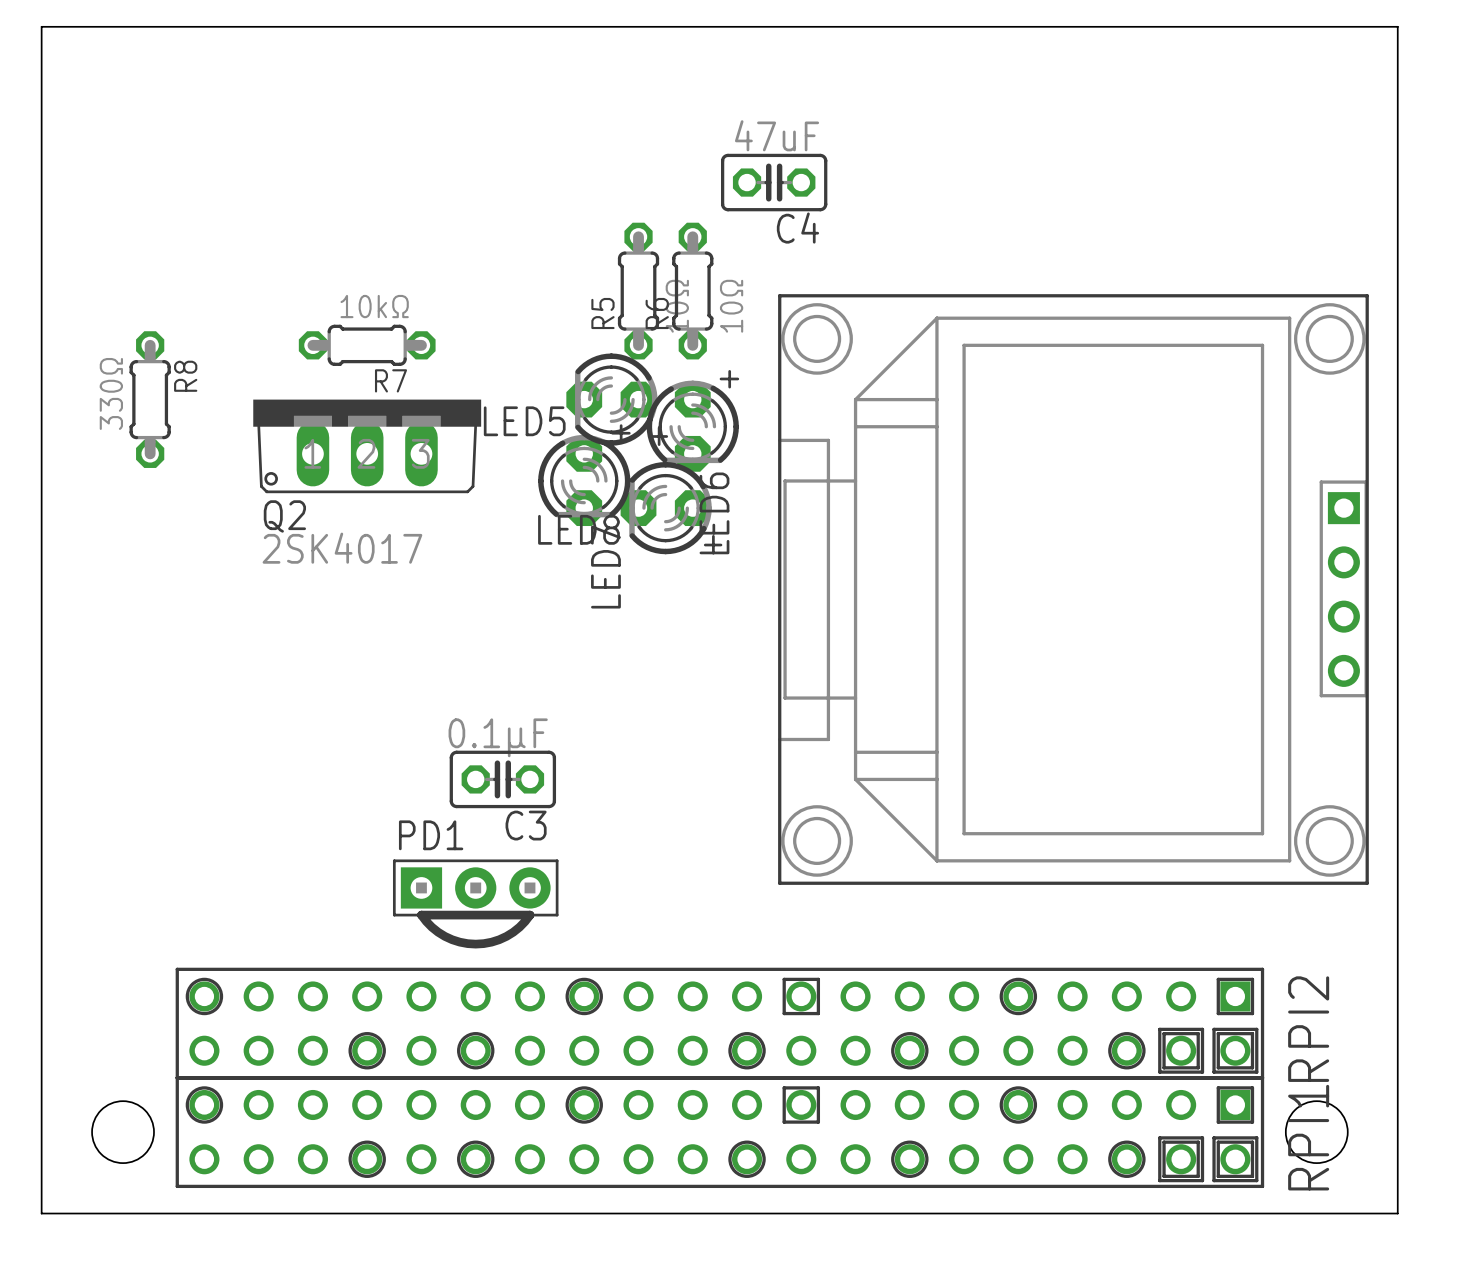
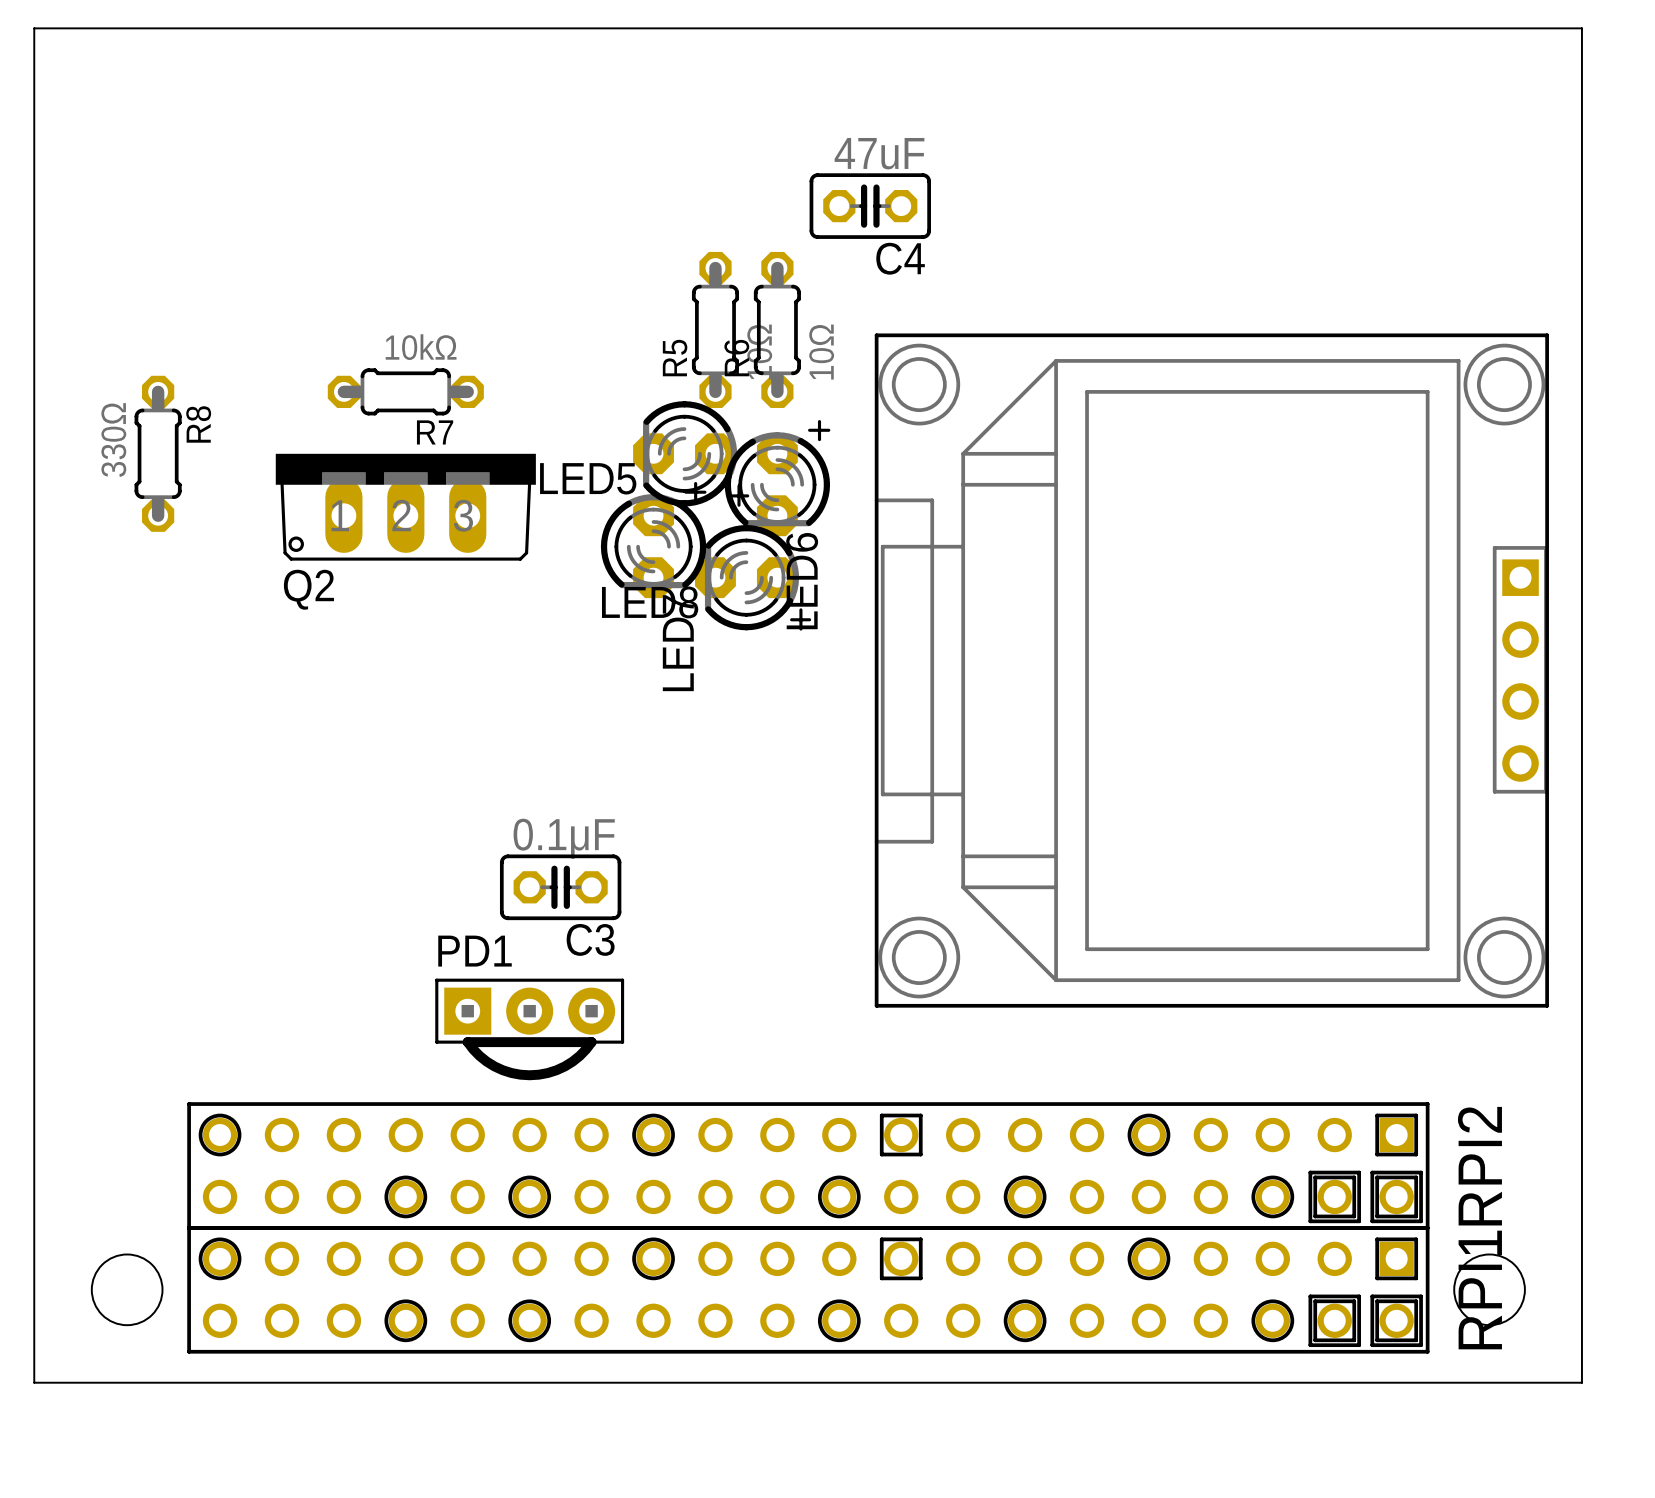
Q2 value: 2SK4017 (342, 548) -> none

